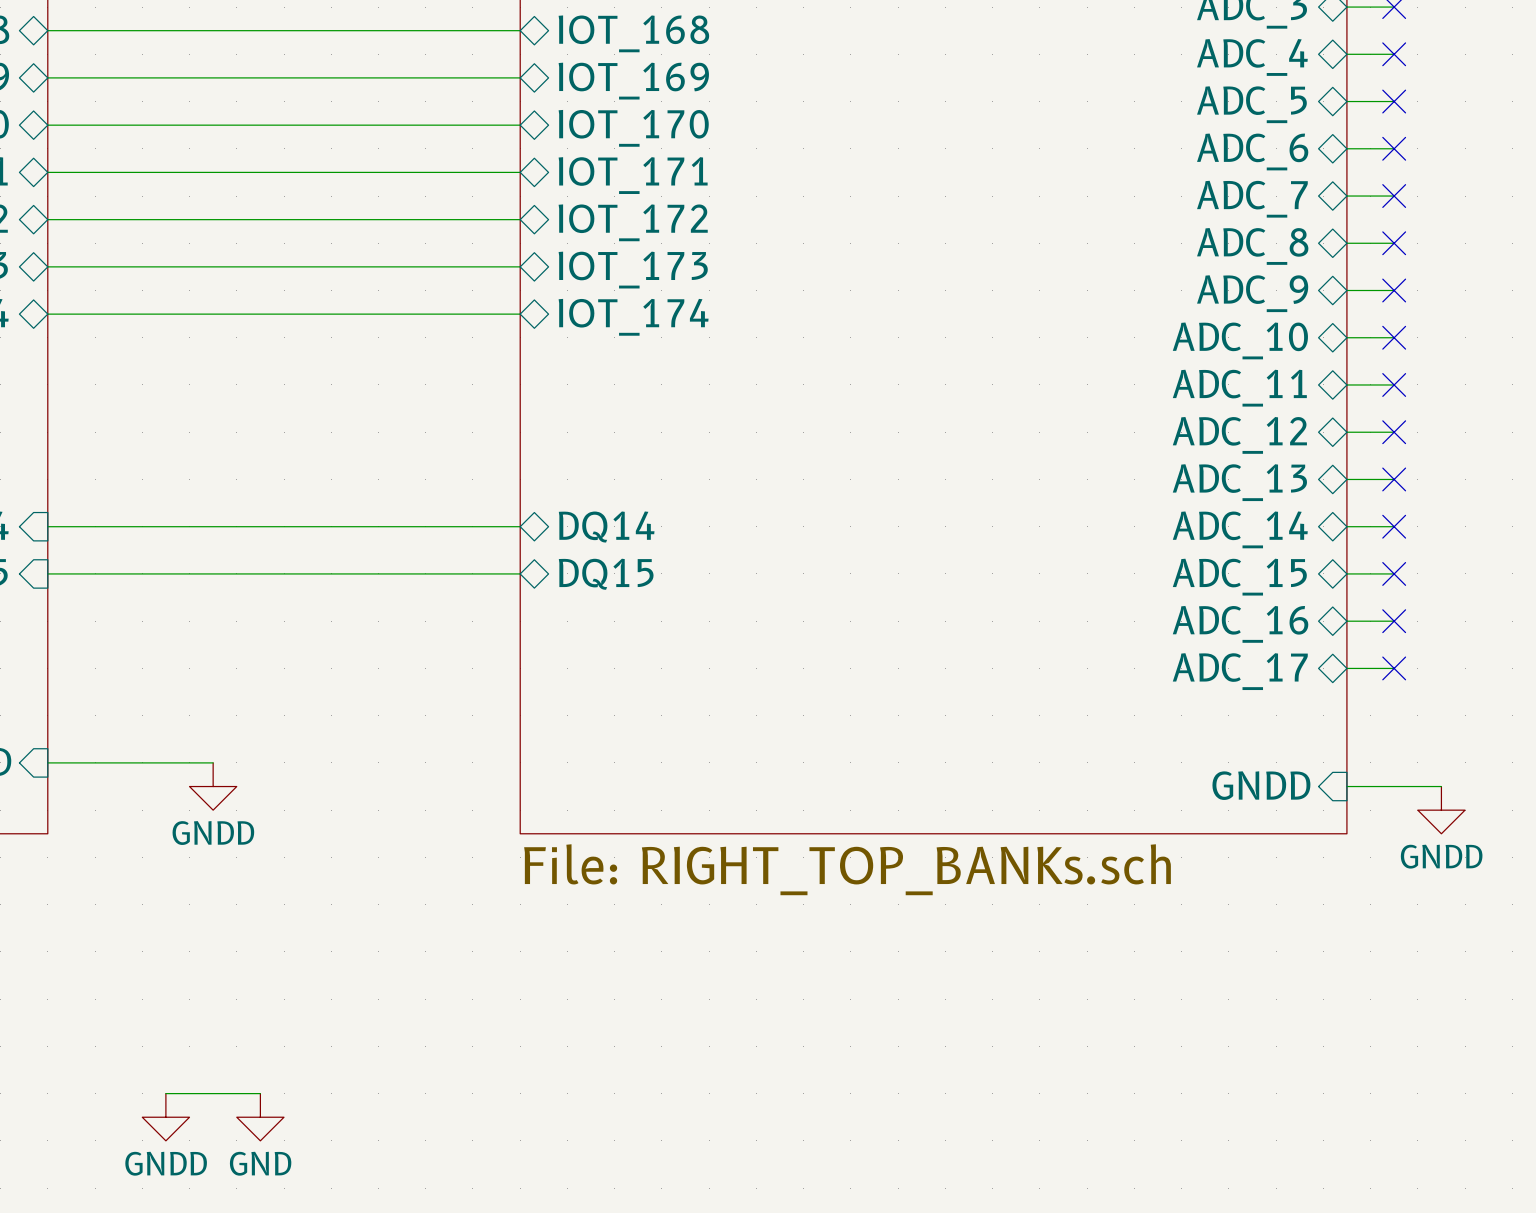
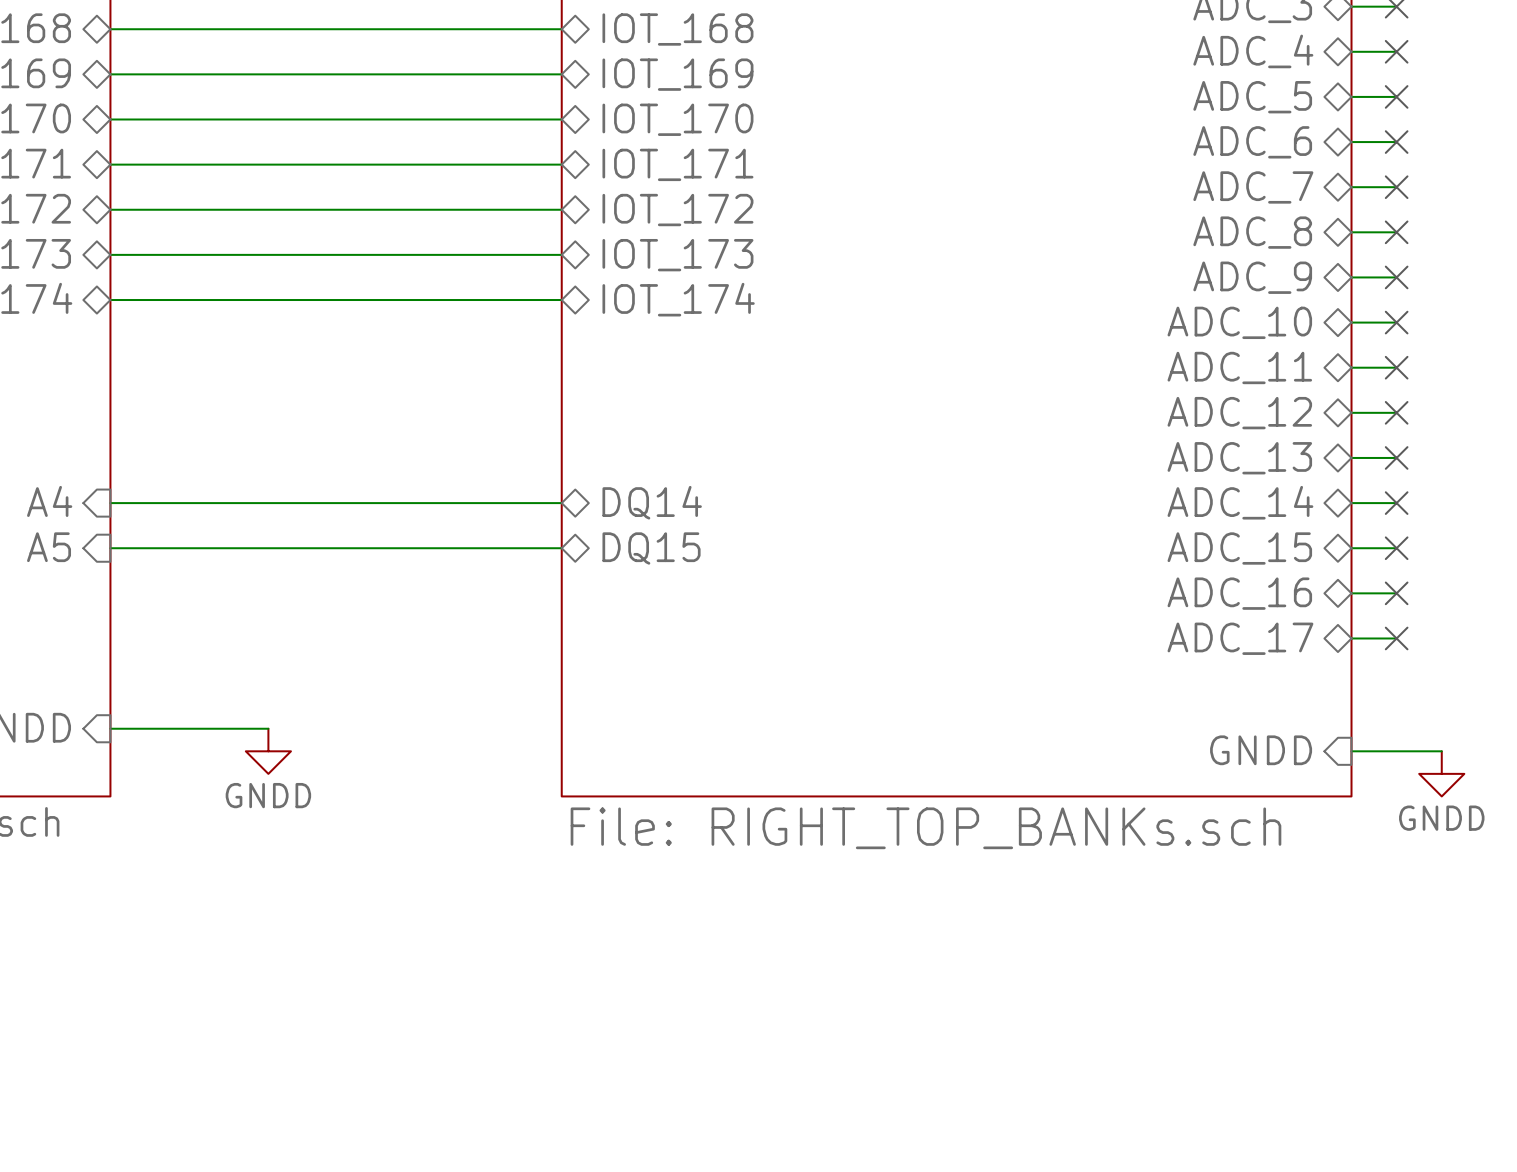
wire: (165, 1093) (260, 1093) -> none
power symbol: GNDD (165, 1117) -> none
power symbol: GND (260, 1117) -> none

